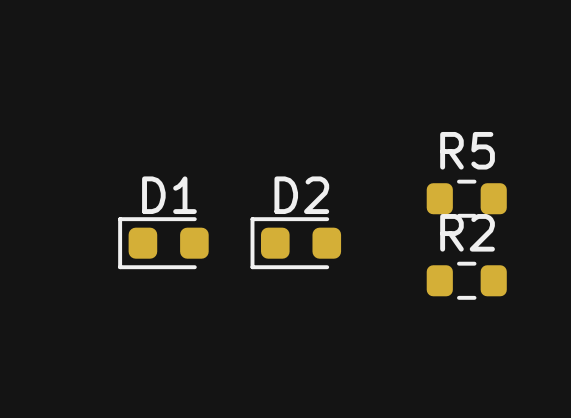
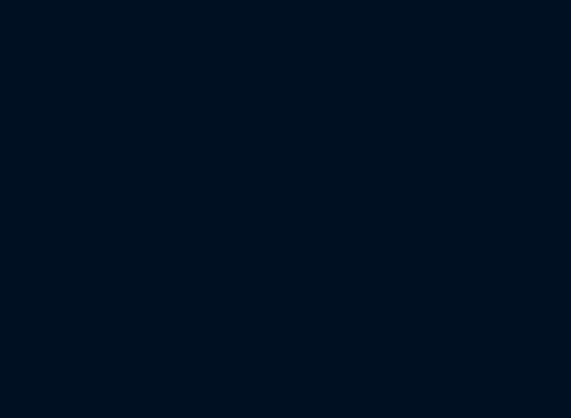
R5: (466, 198) -> none
D1: (163, 243) -> none
D2: (295, 243) -> none
R2: (466, 280) -> none

